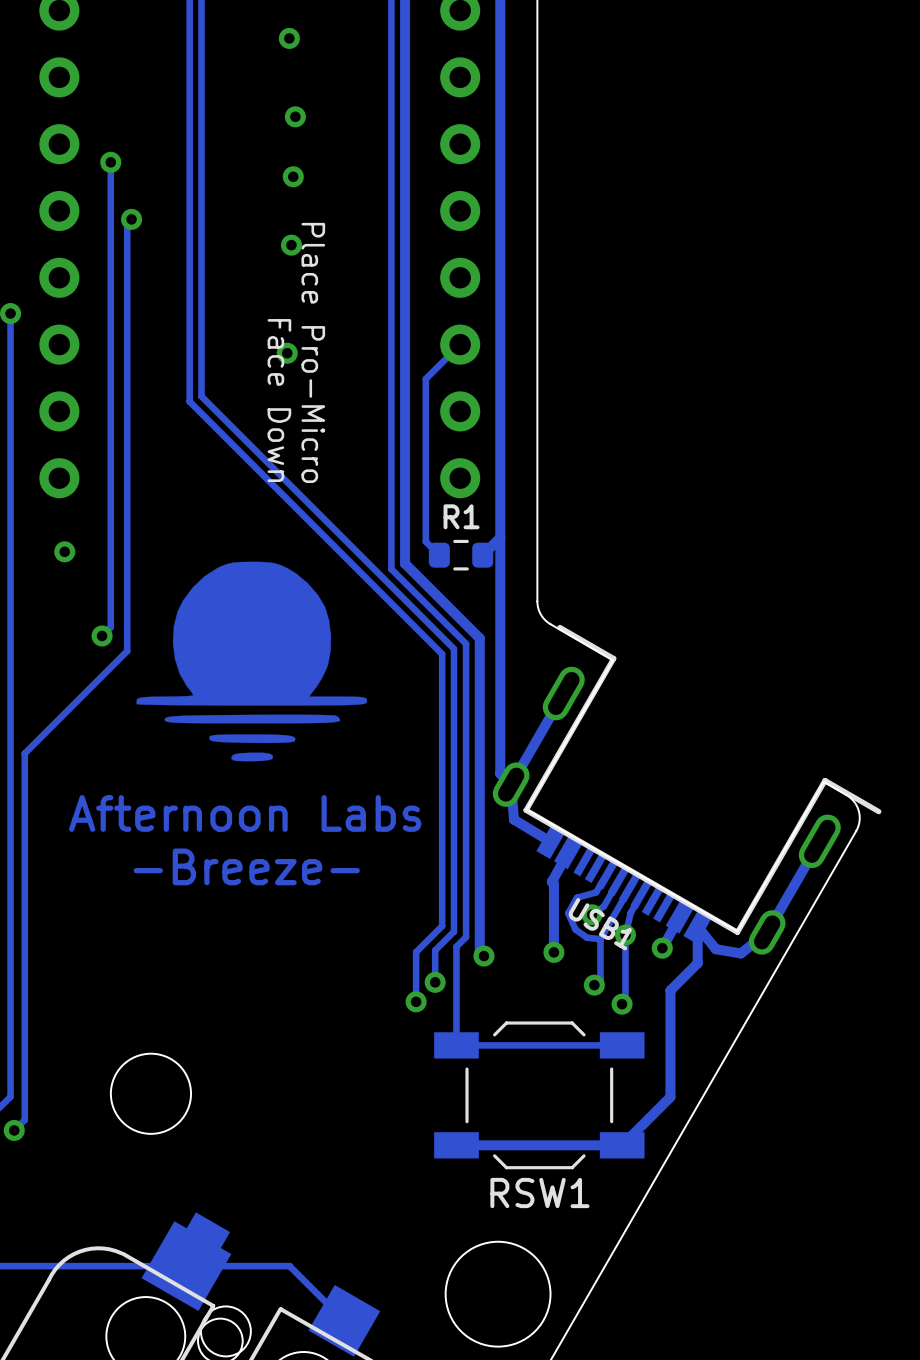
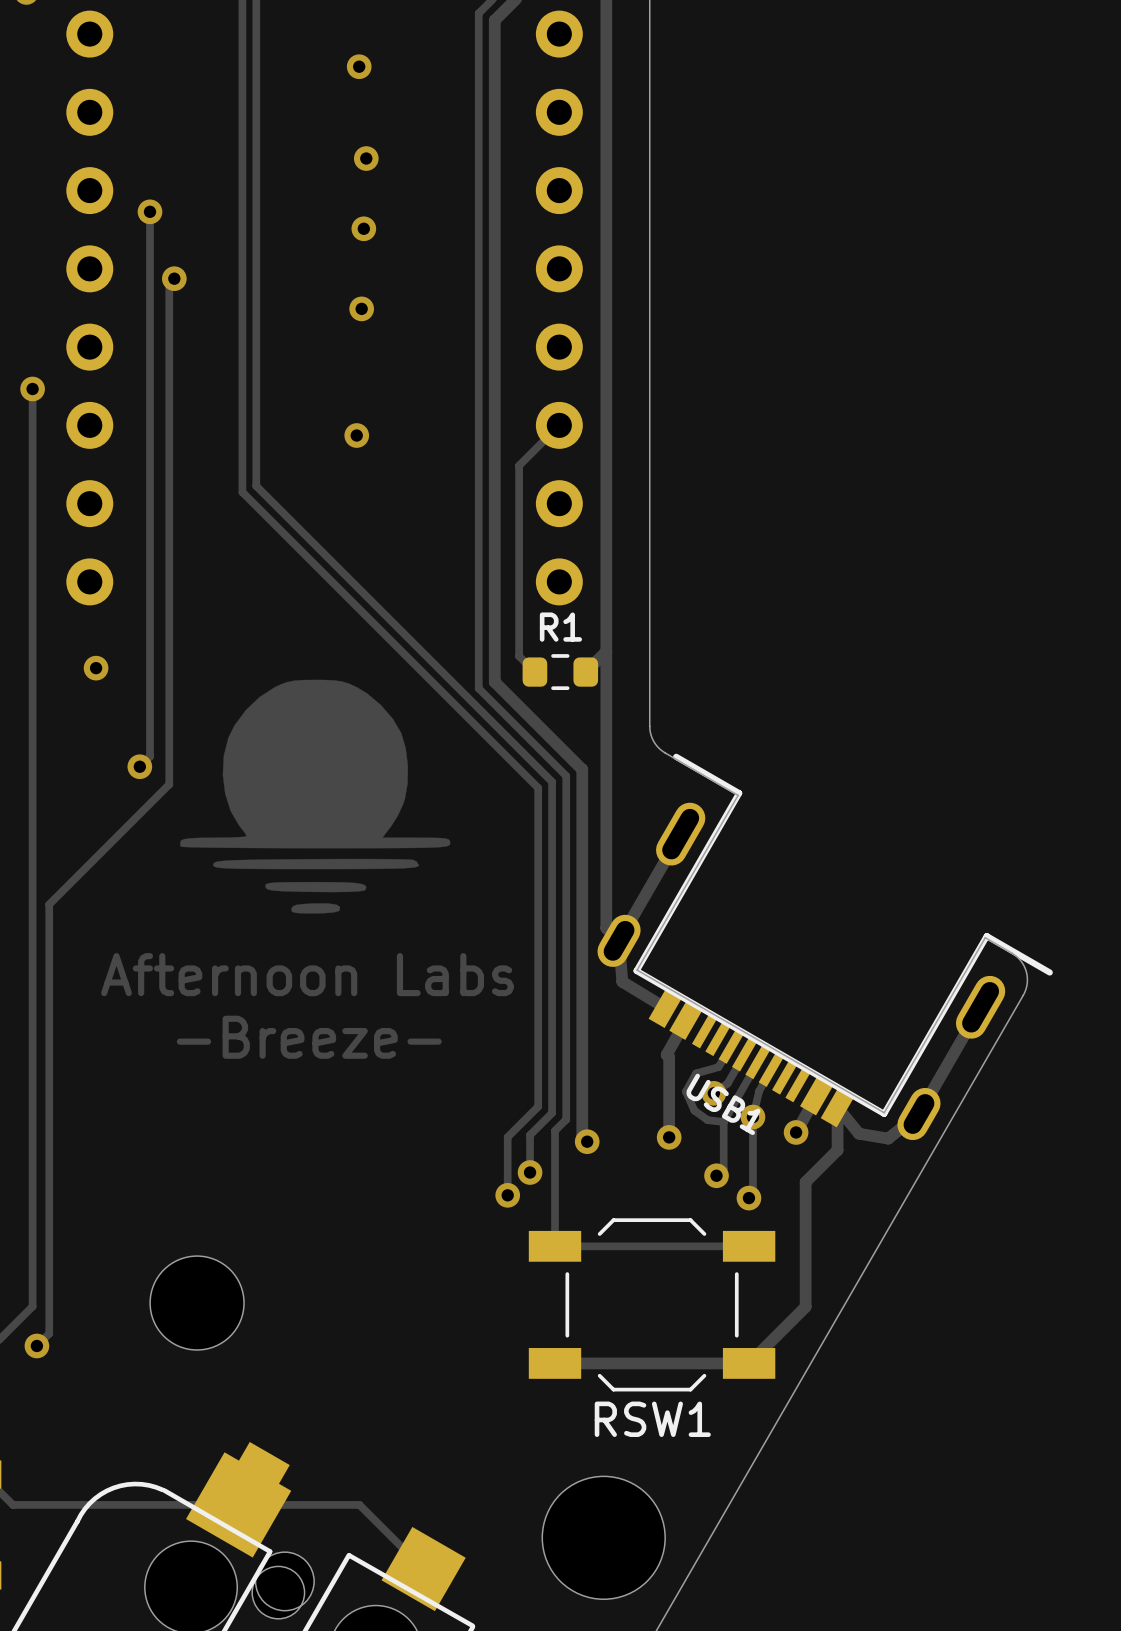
text: Place Pro-Micro (313, 352) -> none
text: Face Down (279, 400) -> none

